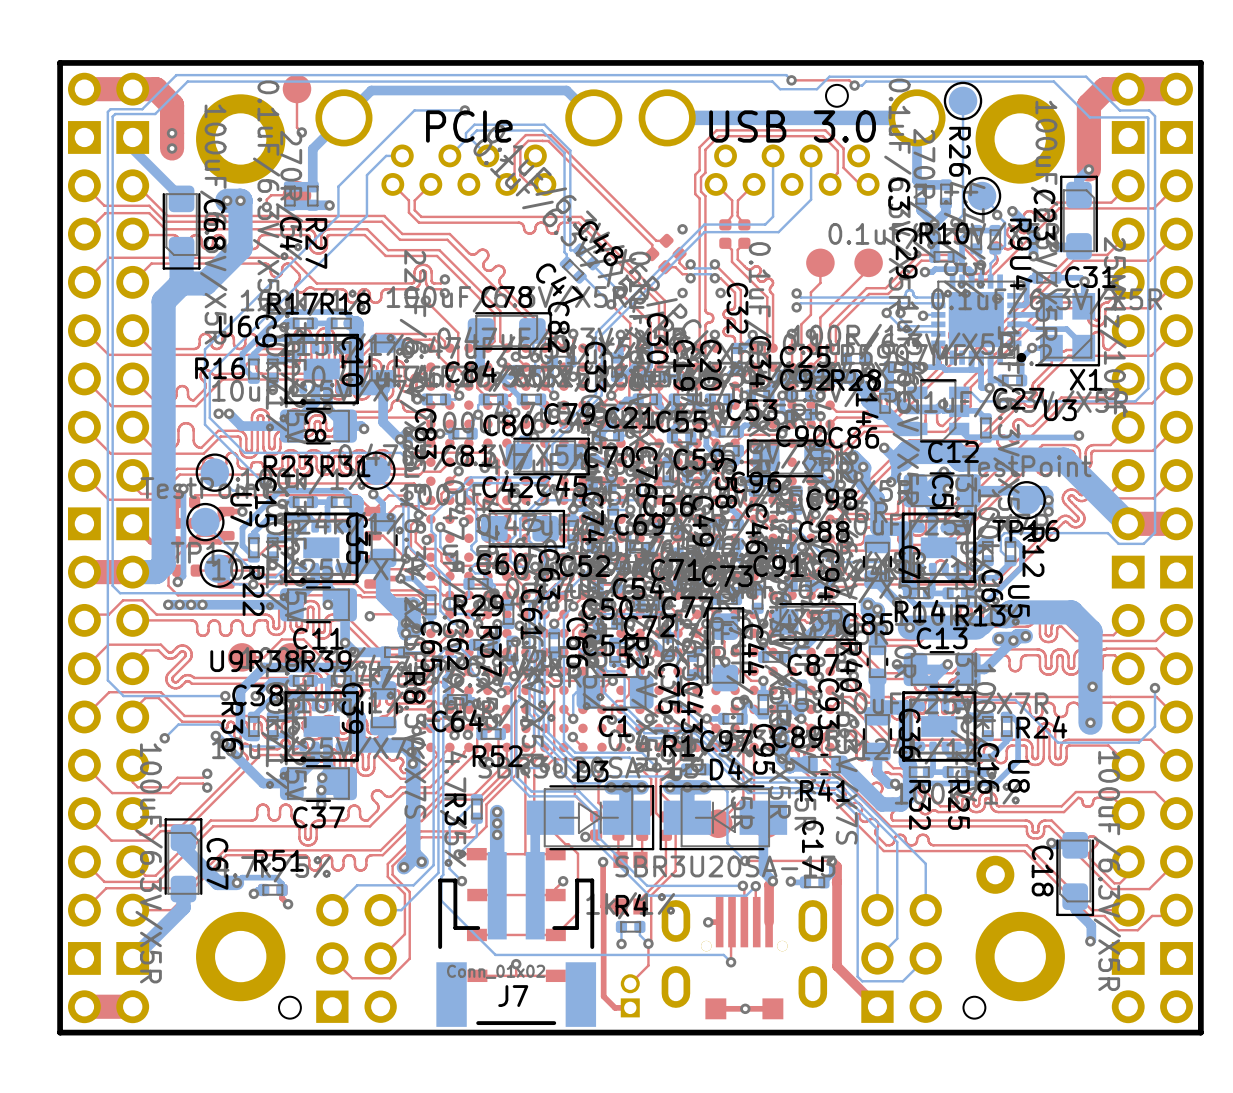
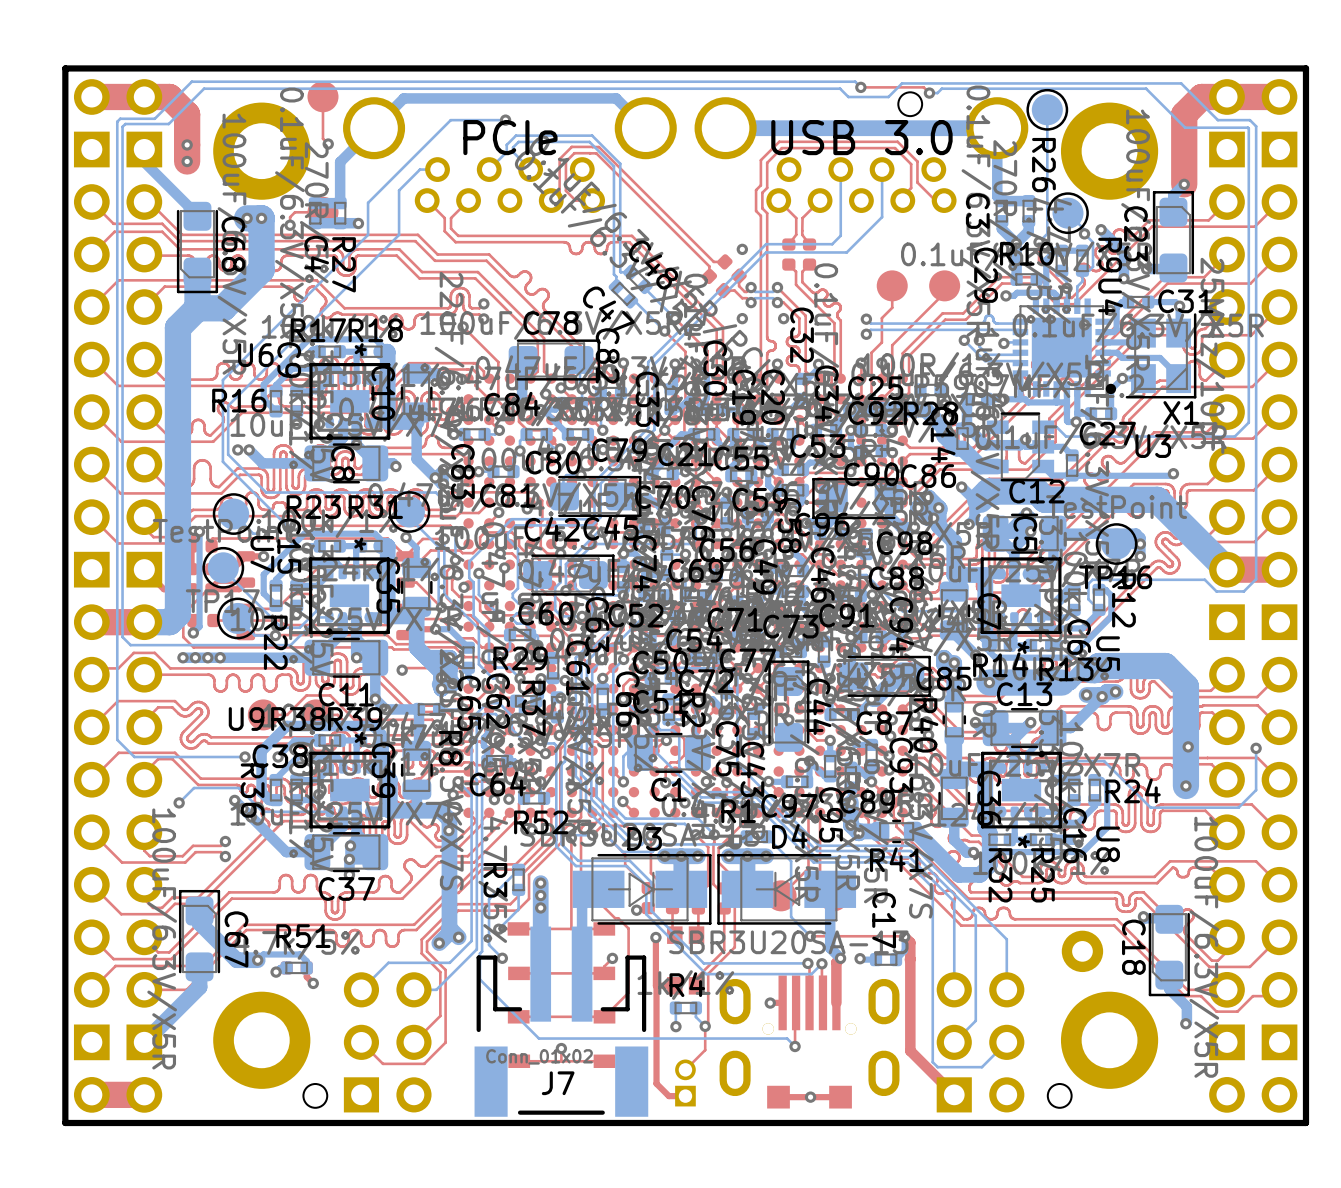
U6 footprint: [284, 333, 359, 405] -> [309, 363, 391, 441]
U5 footprint: [901, 511, 977, 584] -> [980, 556, 1062, 635]
U7 footprint: [284, 512, 359, 584] -> [309, 557, 390, 635]
U8 footprint: [902, 690, 977, 762] -> [981, 751, 1062, 829]
U9 footprint: [284, 691, 359, 763] -> [309, 751, 391, 830]

